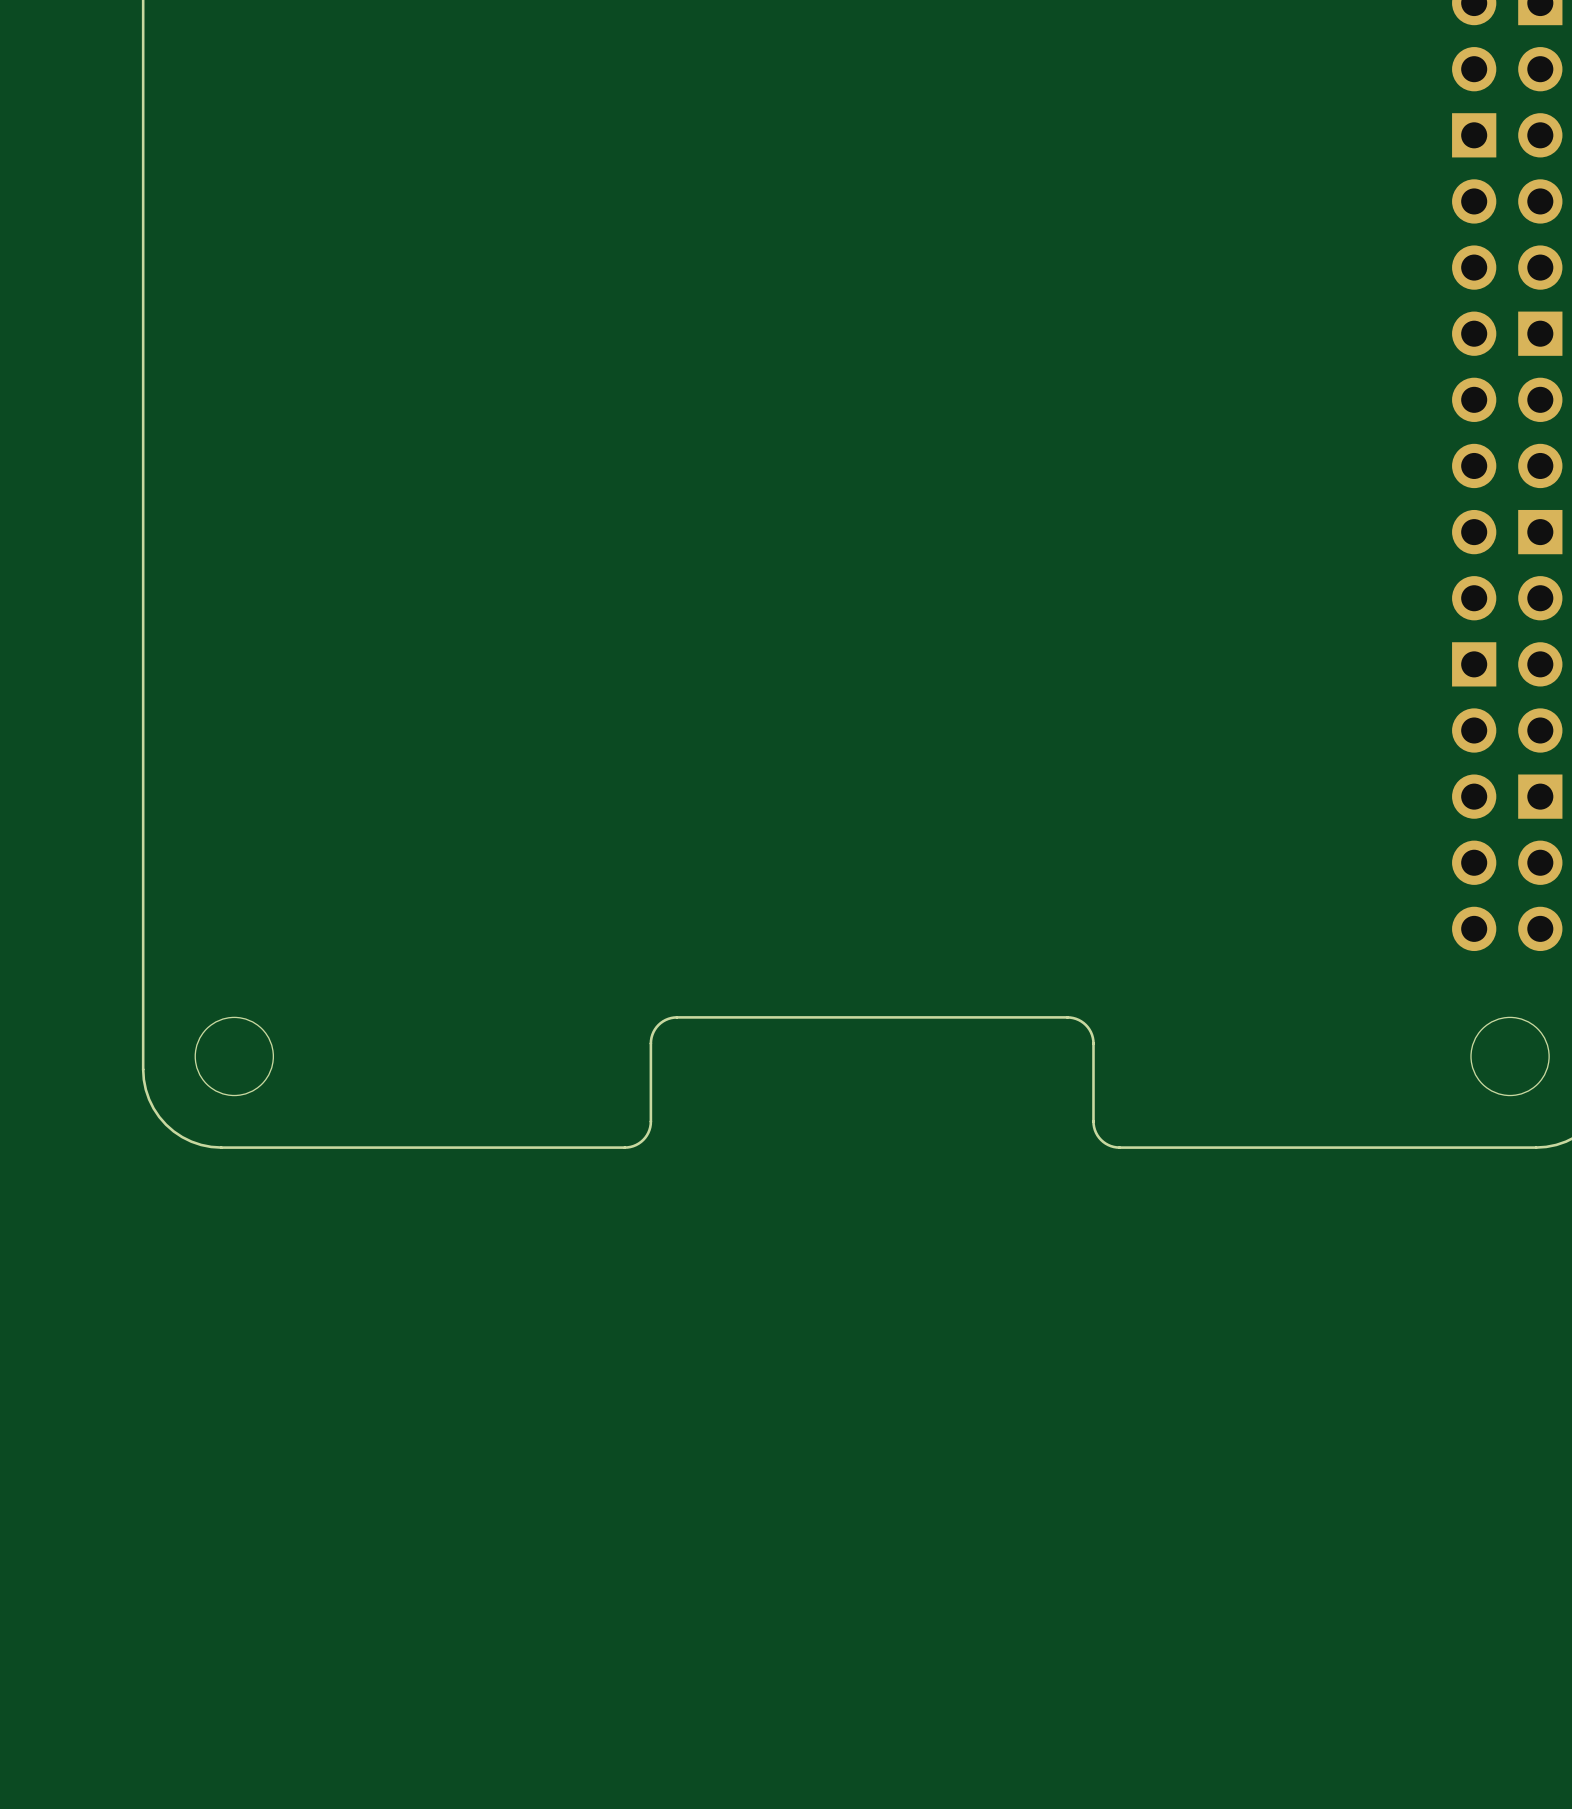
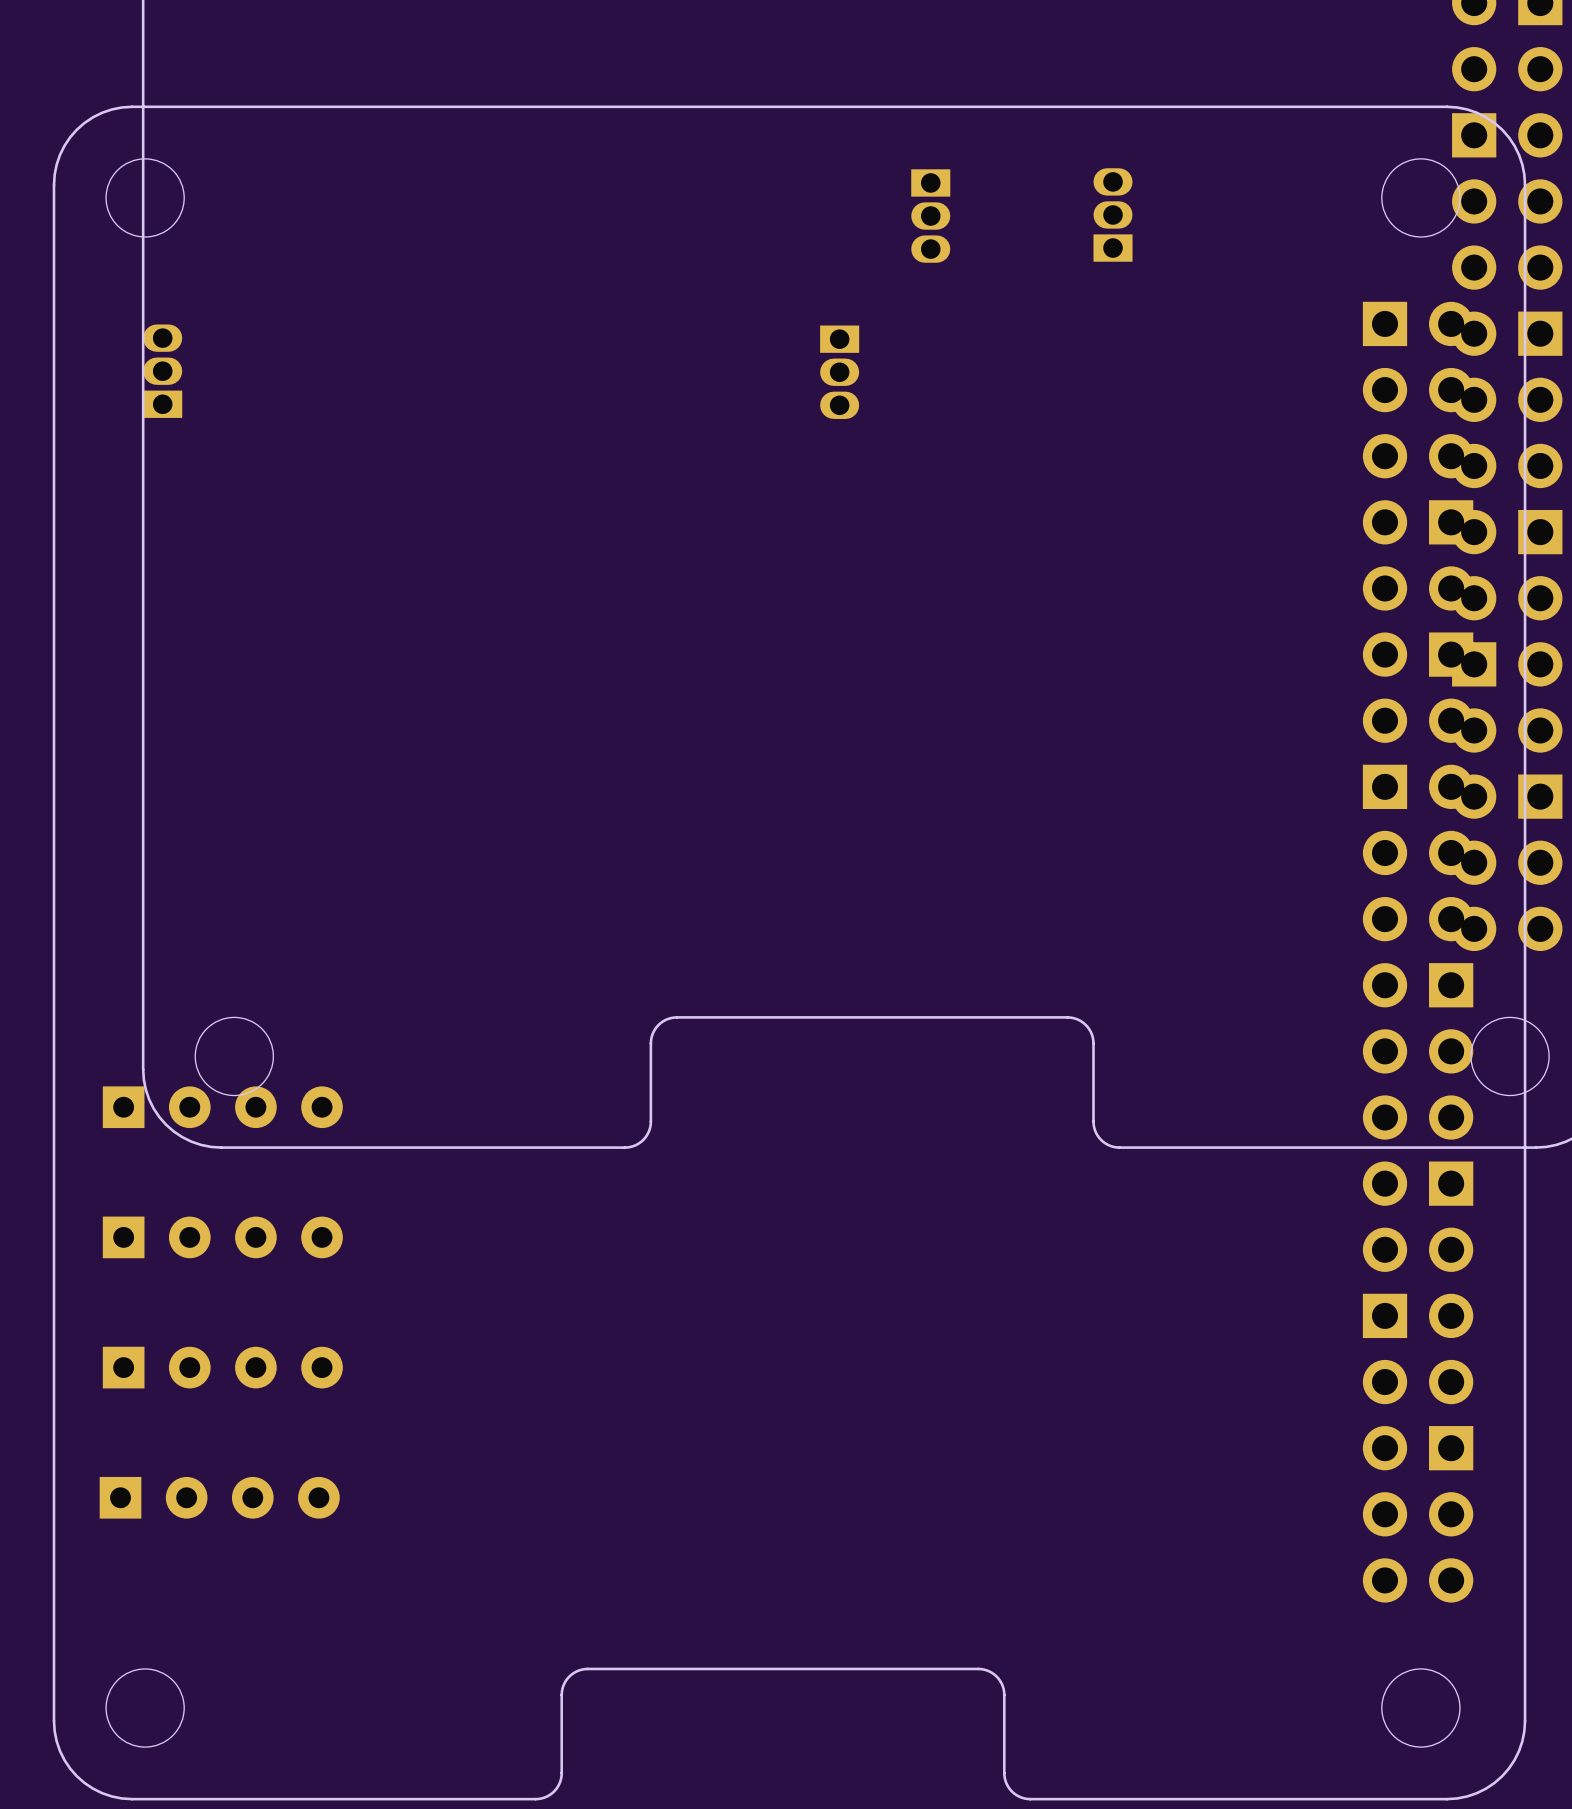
part: none -> (1113, 214)
part: none -> (930, 216)
part: none -> (162, 371)
part: none -> (839, 372)
part: none -> (789, 952)
part: none -> (222, 1107)
part: none -> (222, 1237)
part: none -> (222, 1367)
part: none -> (219, 1497)

